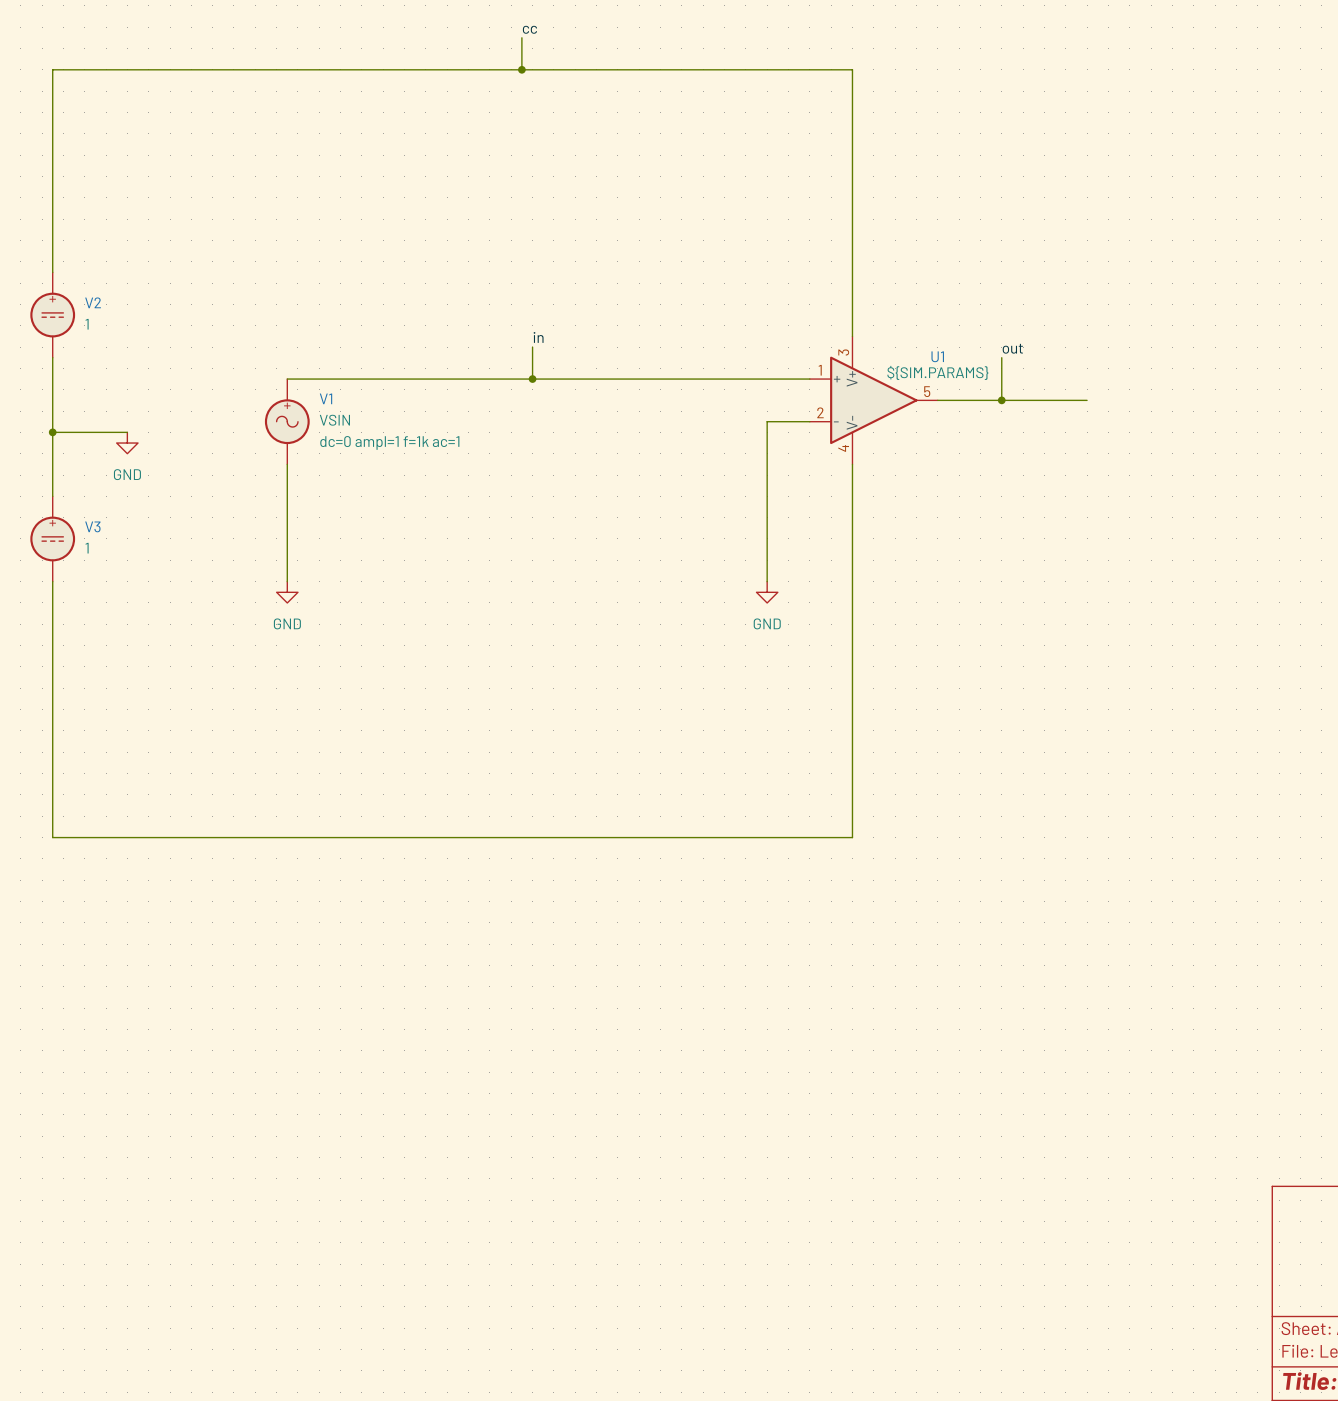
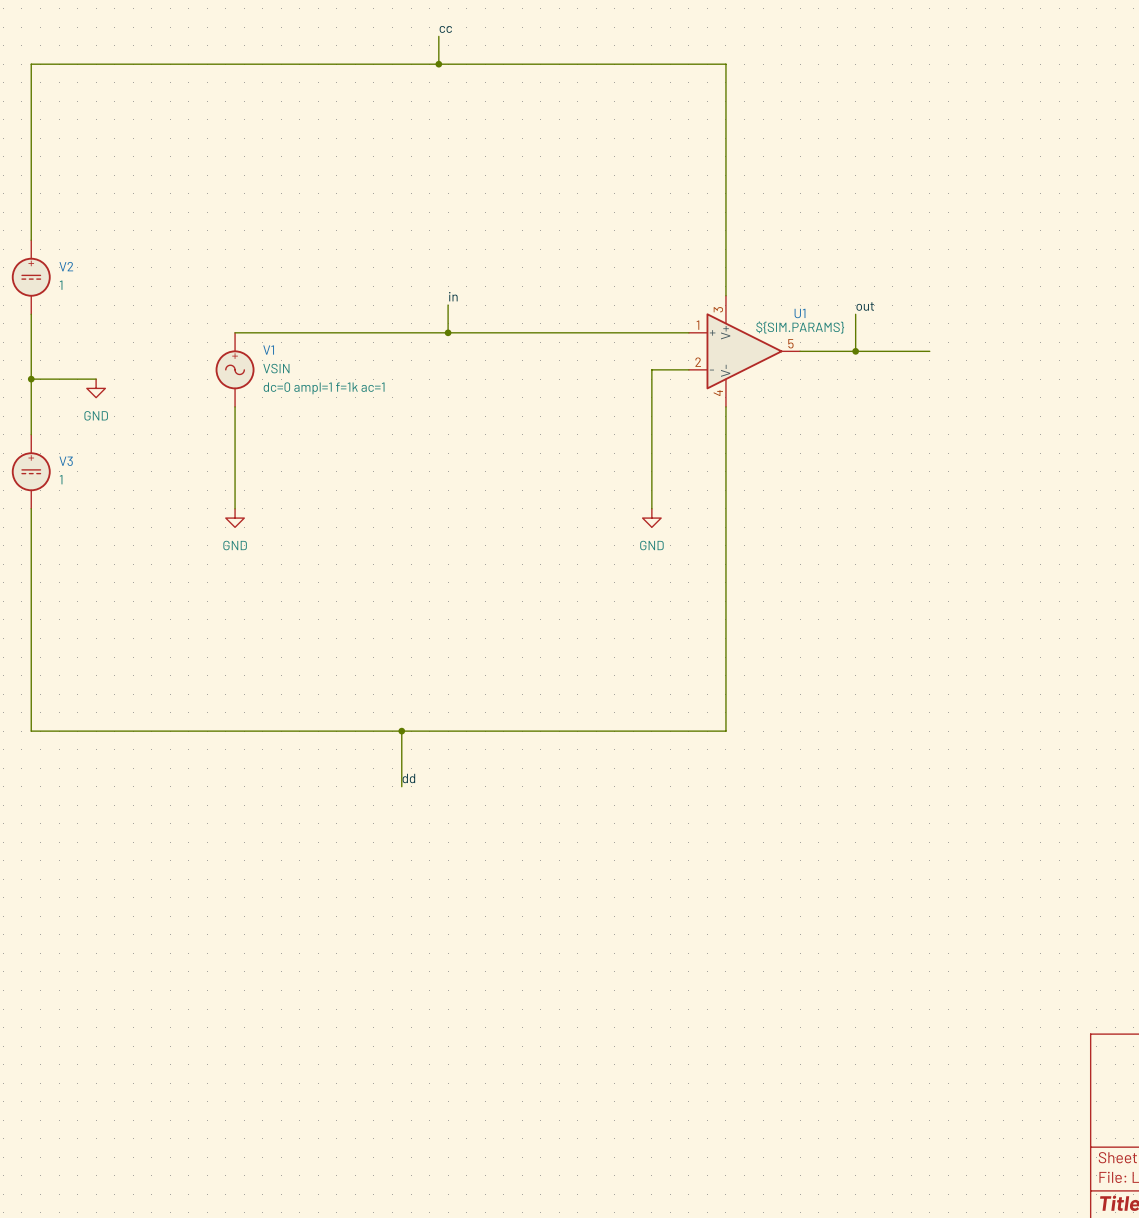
wire: none -> (401, 731) (401, 786)
junction: none -> (401, 731)
label: none -> dd (408, 778)

